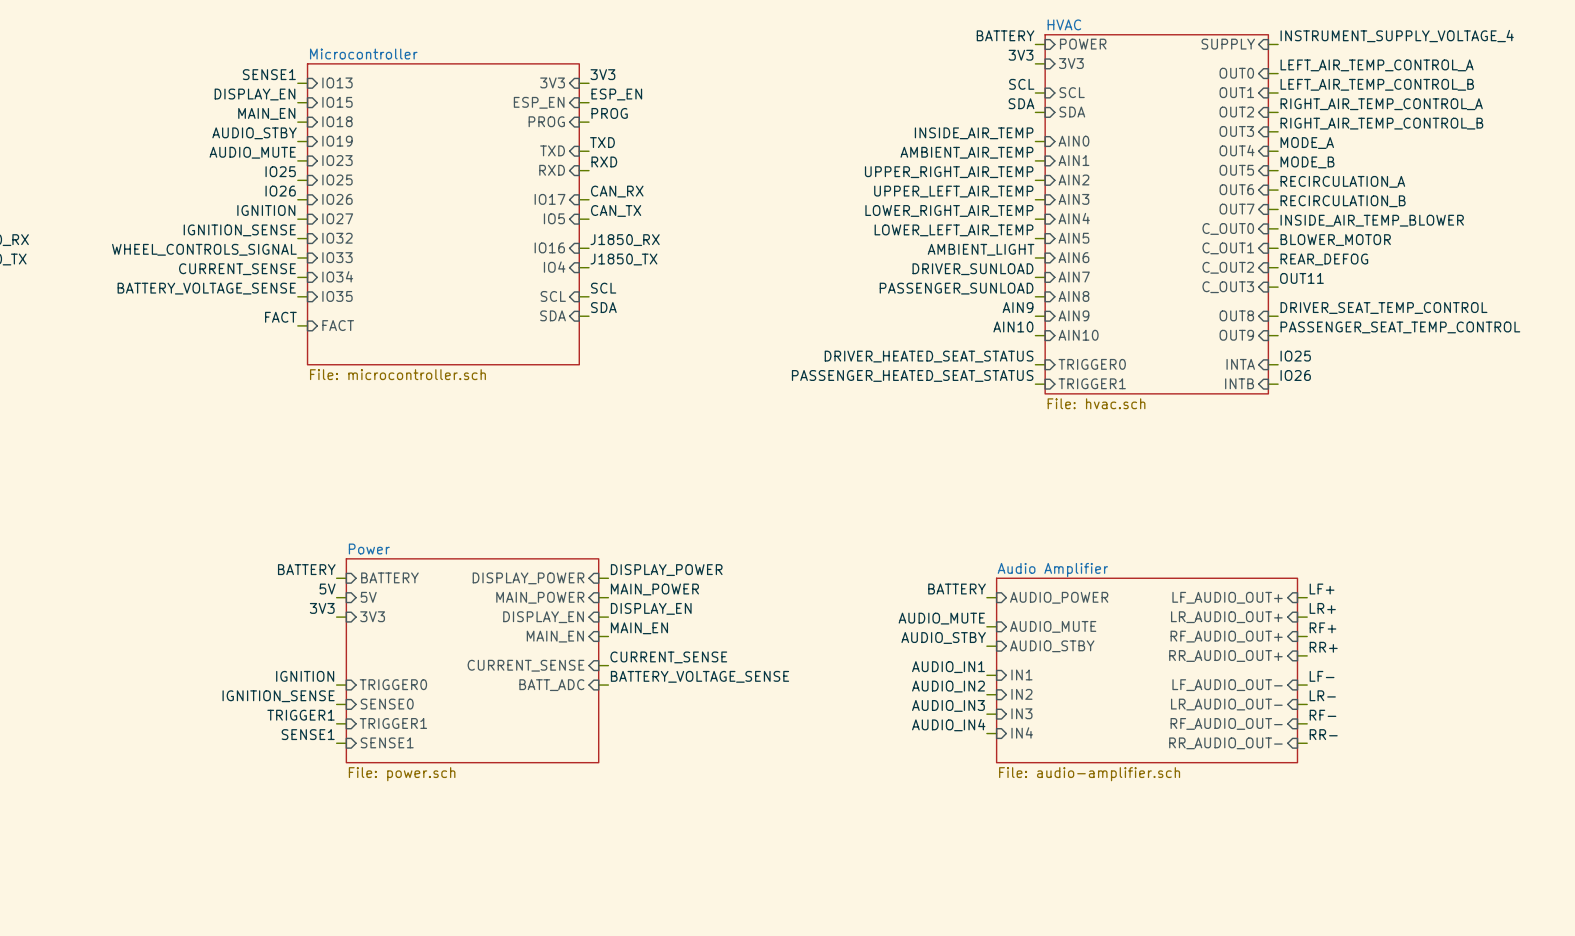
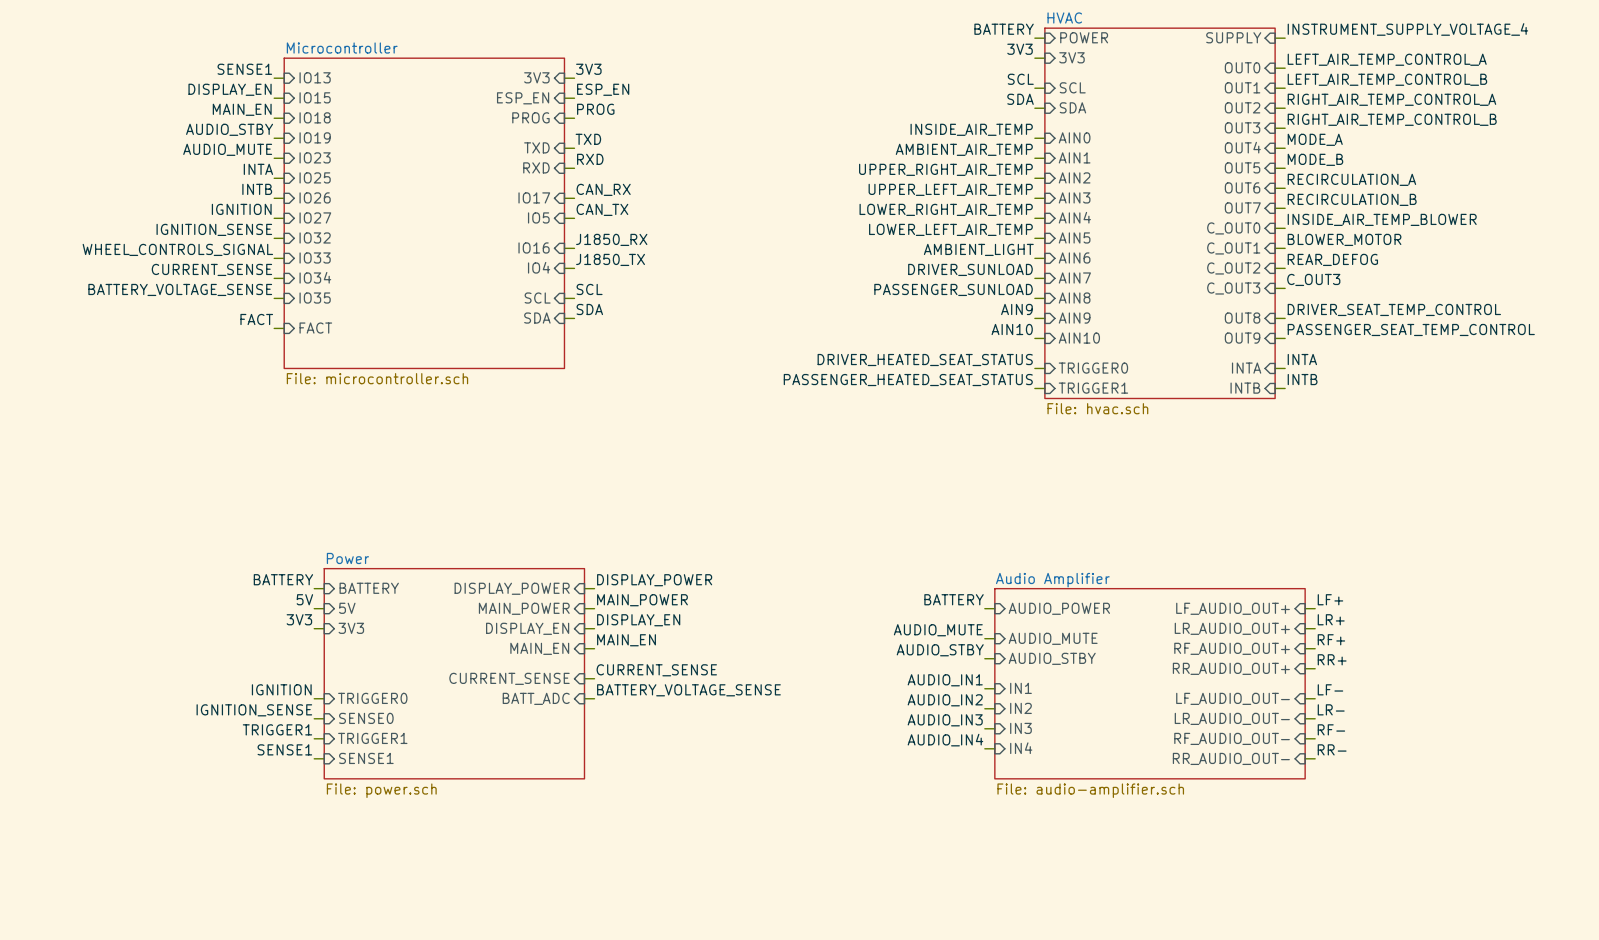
label: IO25 (280, 171) -> INTA (258, 169)
label: IO26 (280, 191) -> INTB (257, 189)
label: OUT11 (1301, 278) -> C_OUT3 (1313, 279)
label: IO25 (1295, 356) -> INTA (1302, 359)
label: IO26 (1295, 375) -> INTB (1302, 379)

